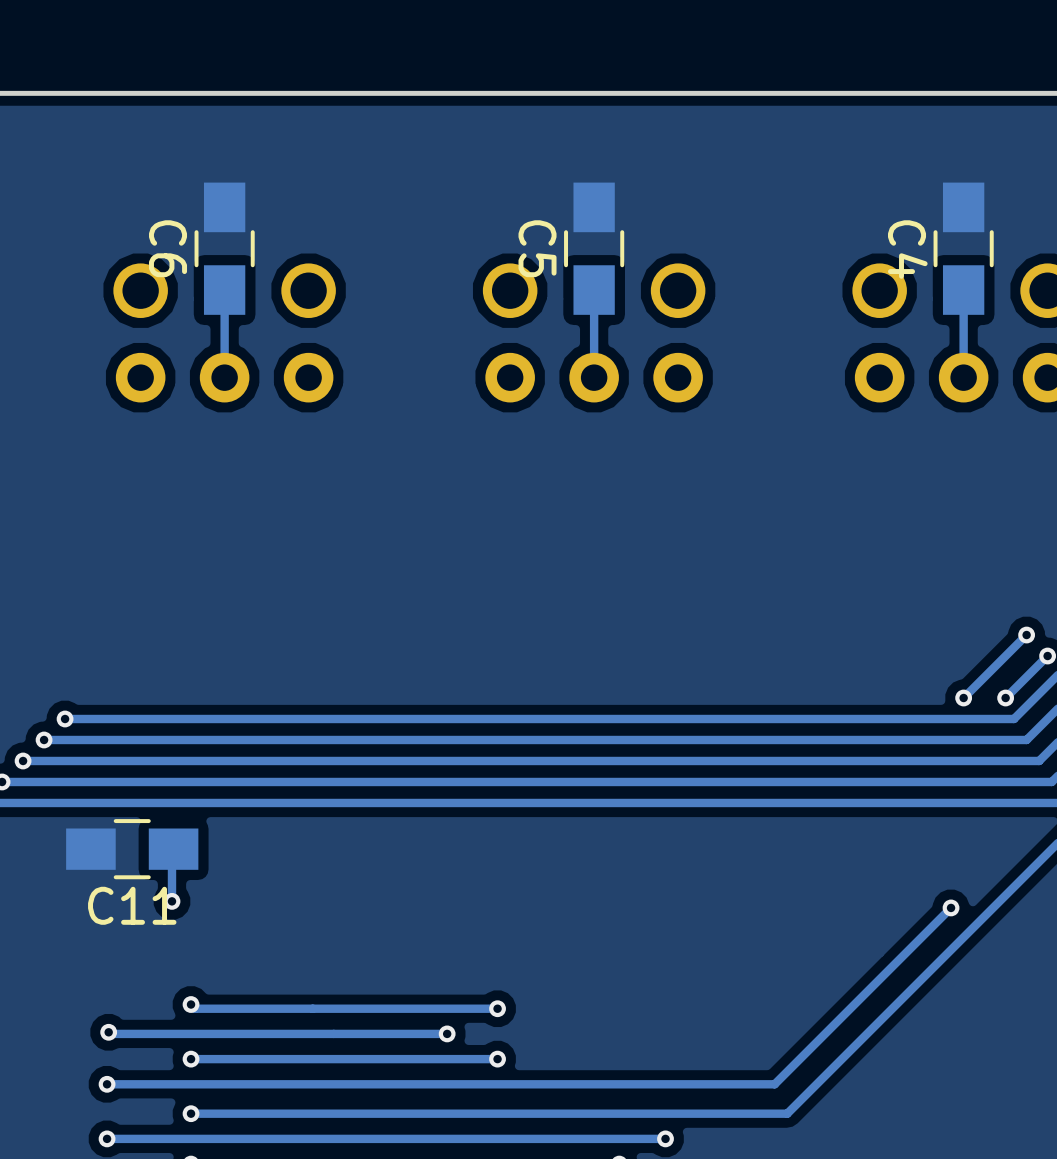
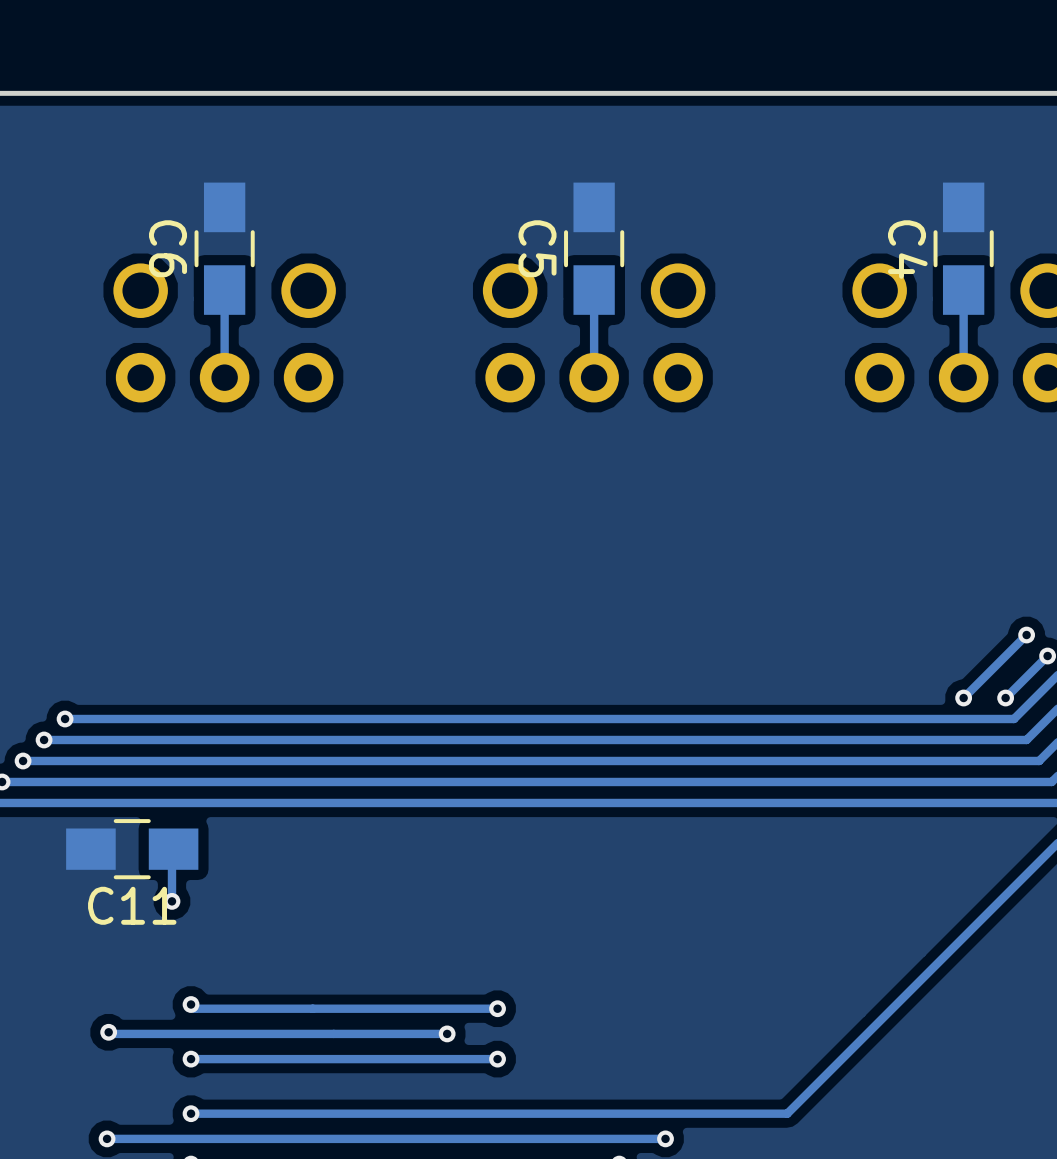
track: (951, 907) (774, 1084) (107, 1084) -> none
via: (951, 907) -> none
via: (107, 1084) -> none

